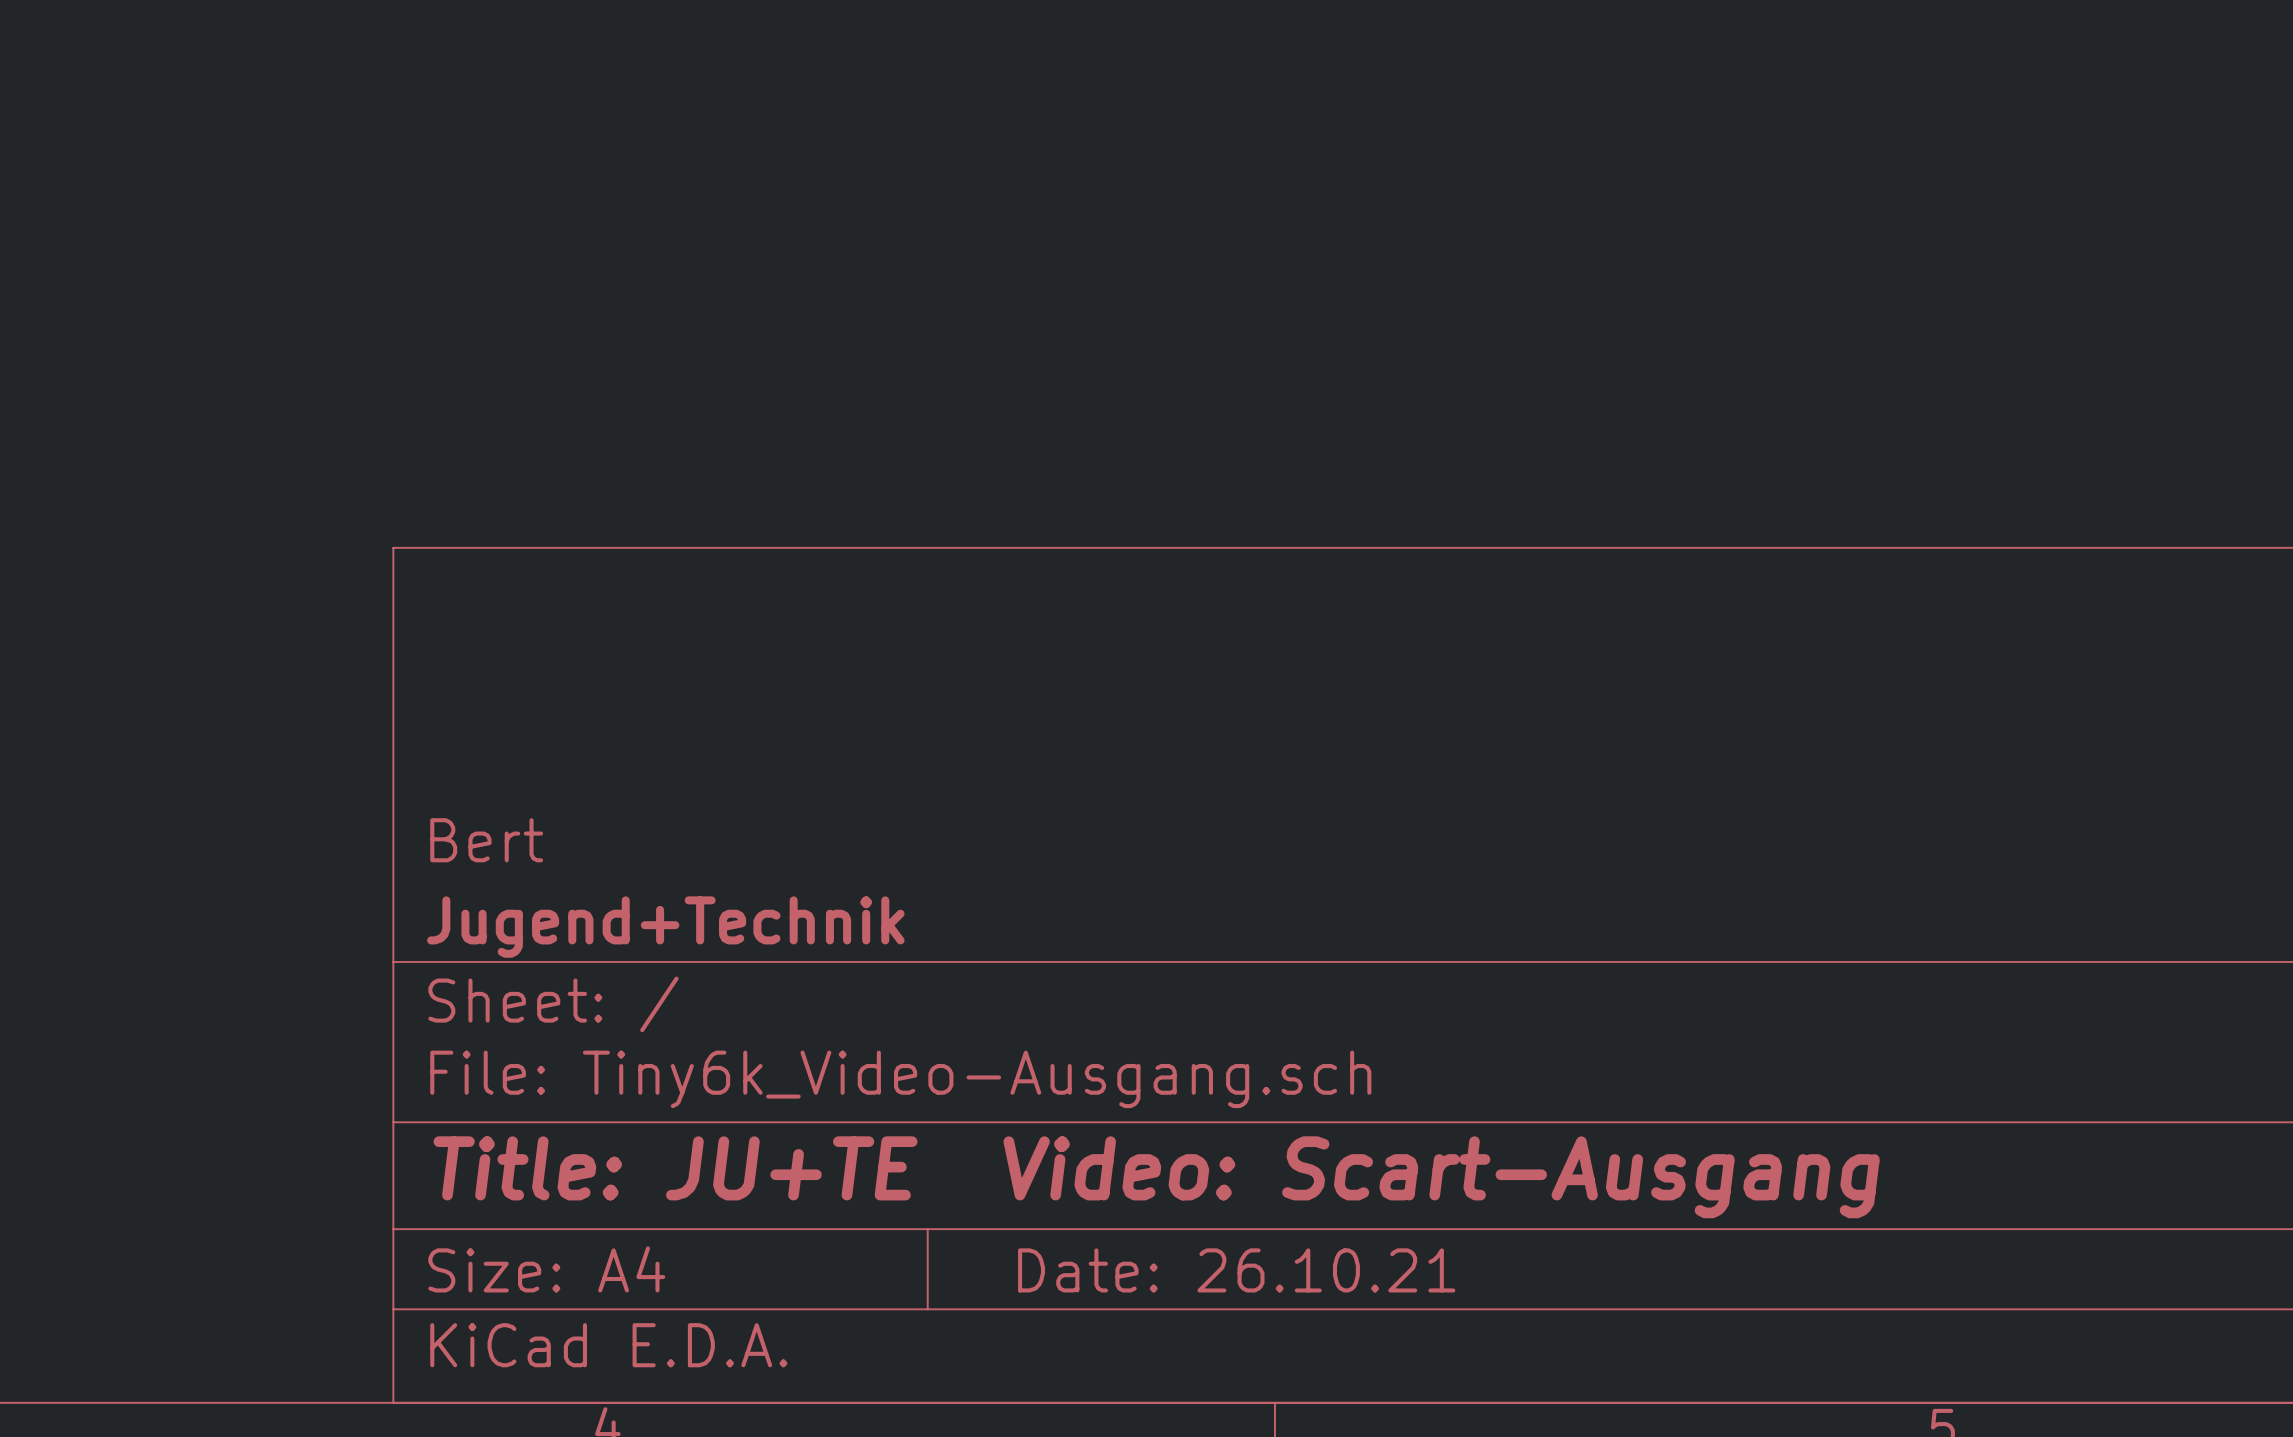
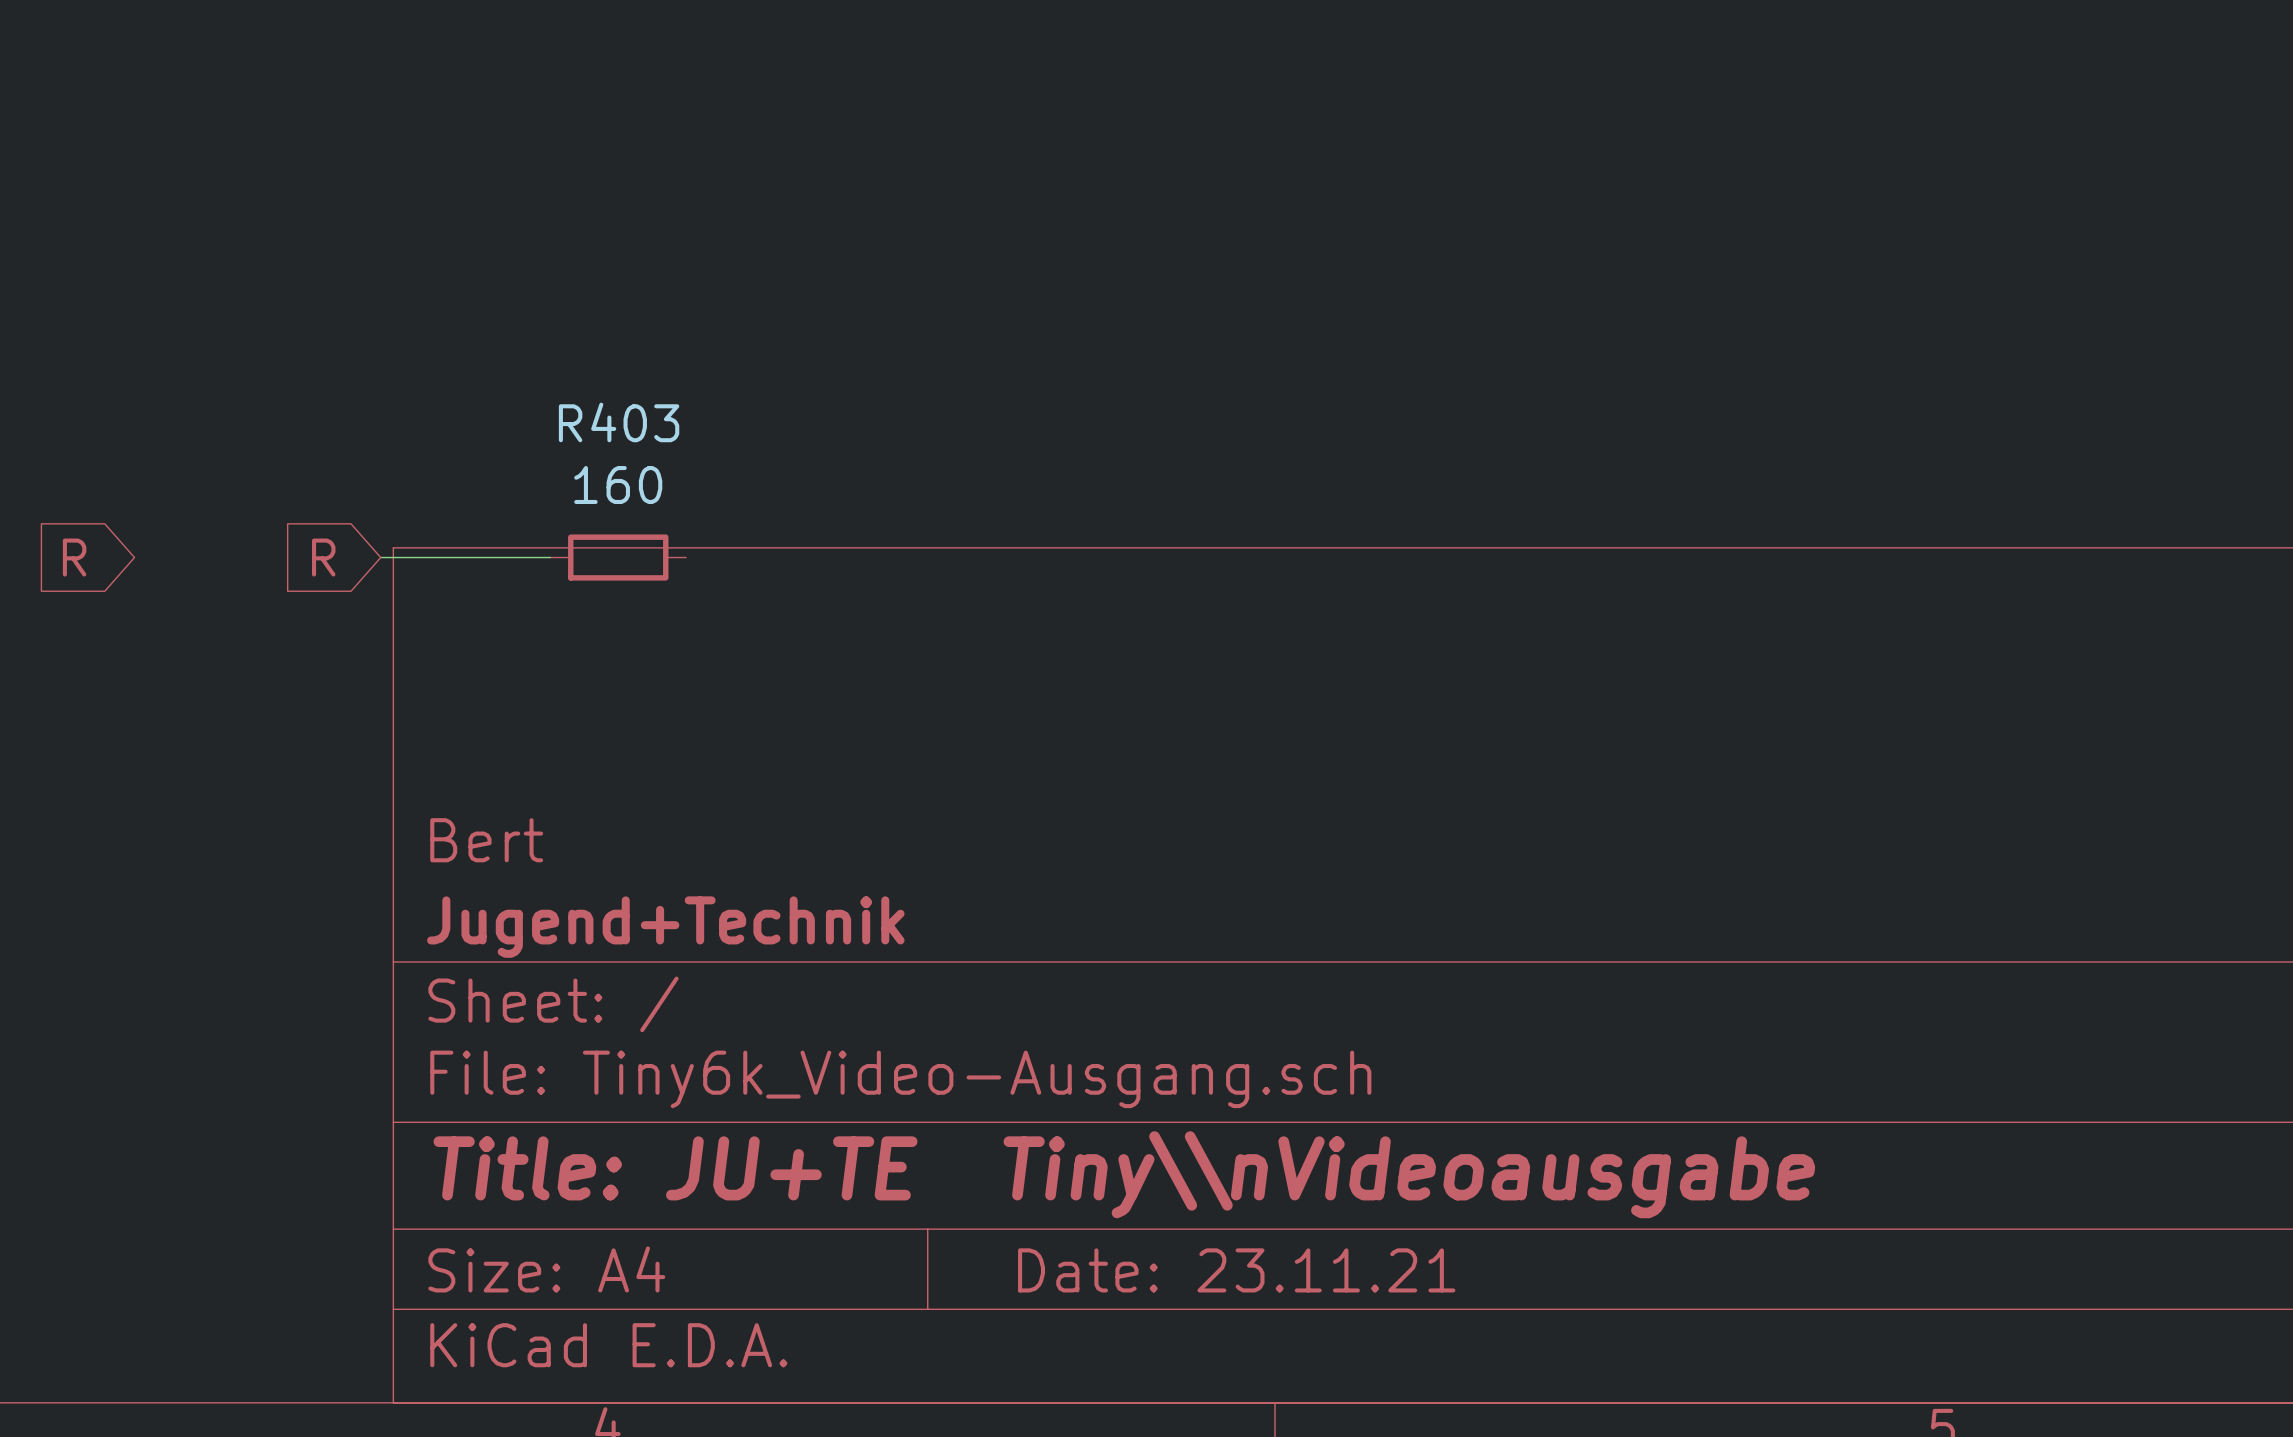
global label: none -> R (74, 557)
global label: none -> R (323, 557)
wire: none -> (380, 557) (550, 557)
R403: none -> 160 (618, 557)
title block: Title: JU+TE Video: Scart-Ausgang (1156, 1177) -> Title: JU+TE Tiny\\nVideoausgabe (1124, 1174)
title block: Date: 26.10.21 (1236, 1270) -> Date: 23.11.21 (1236, 1270)

